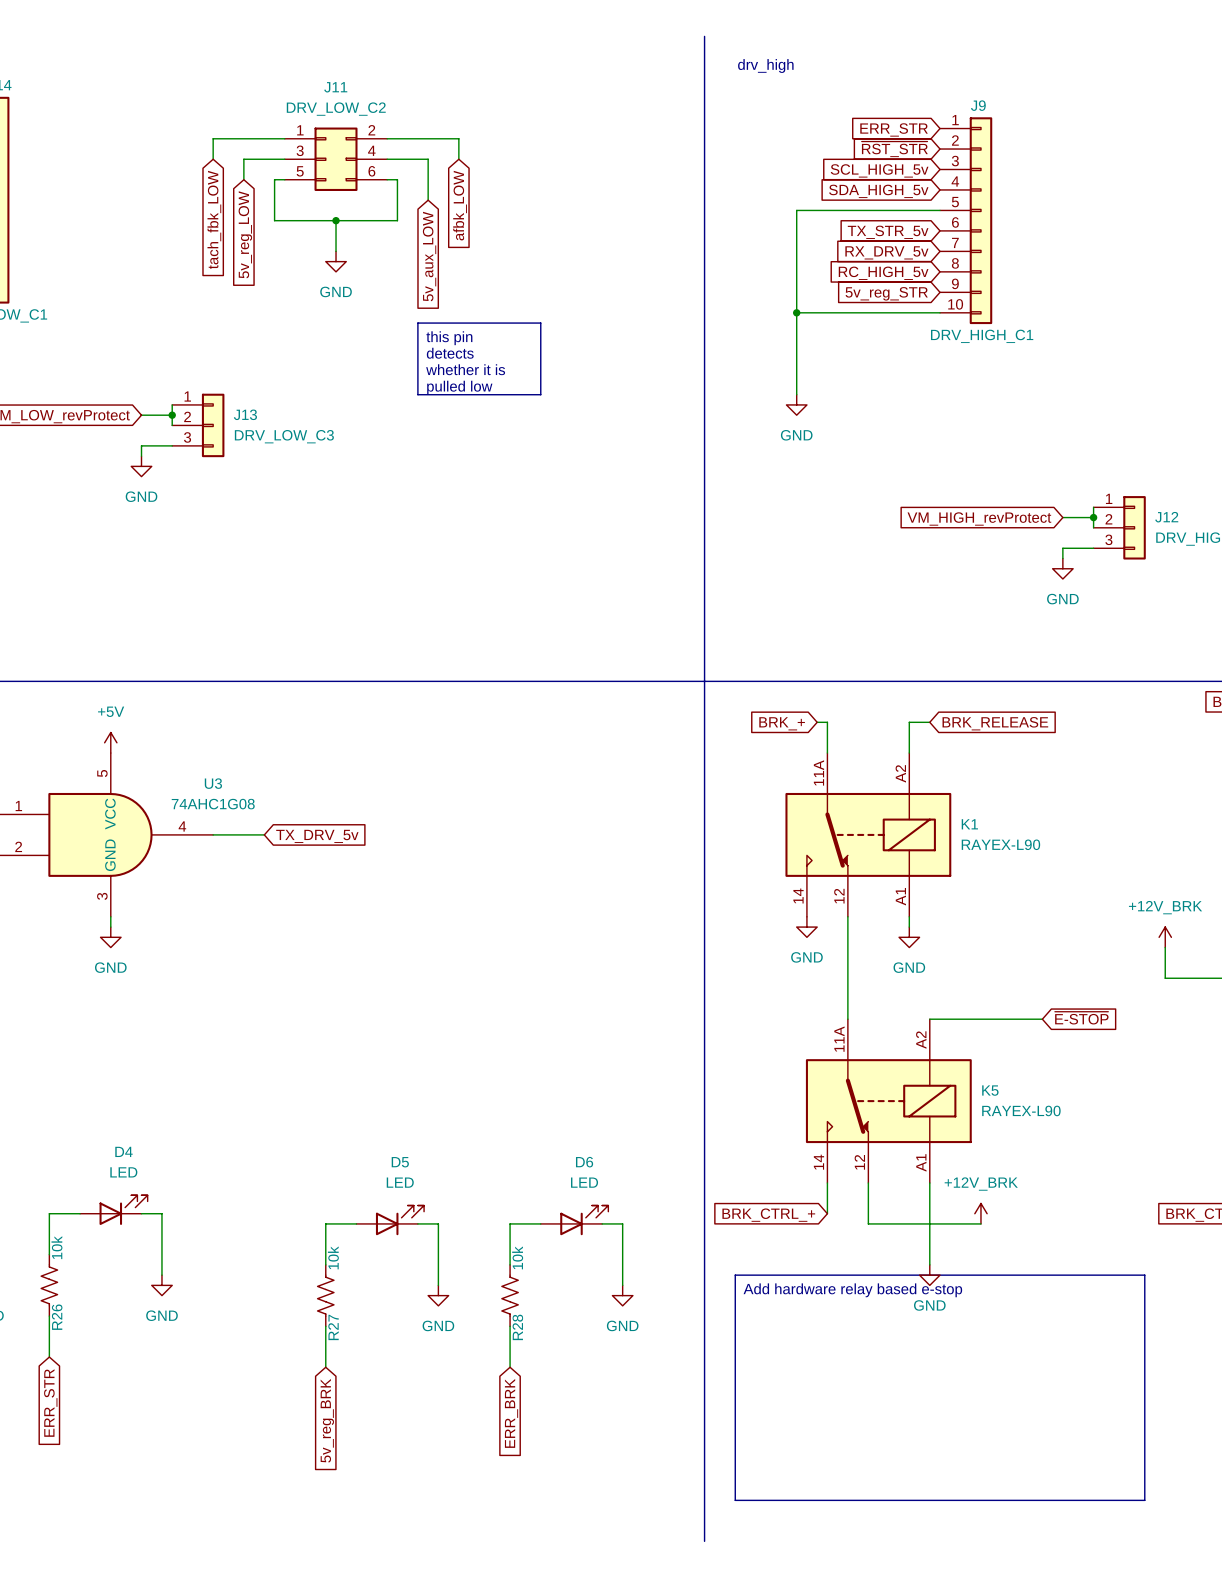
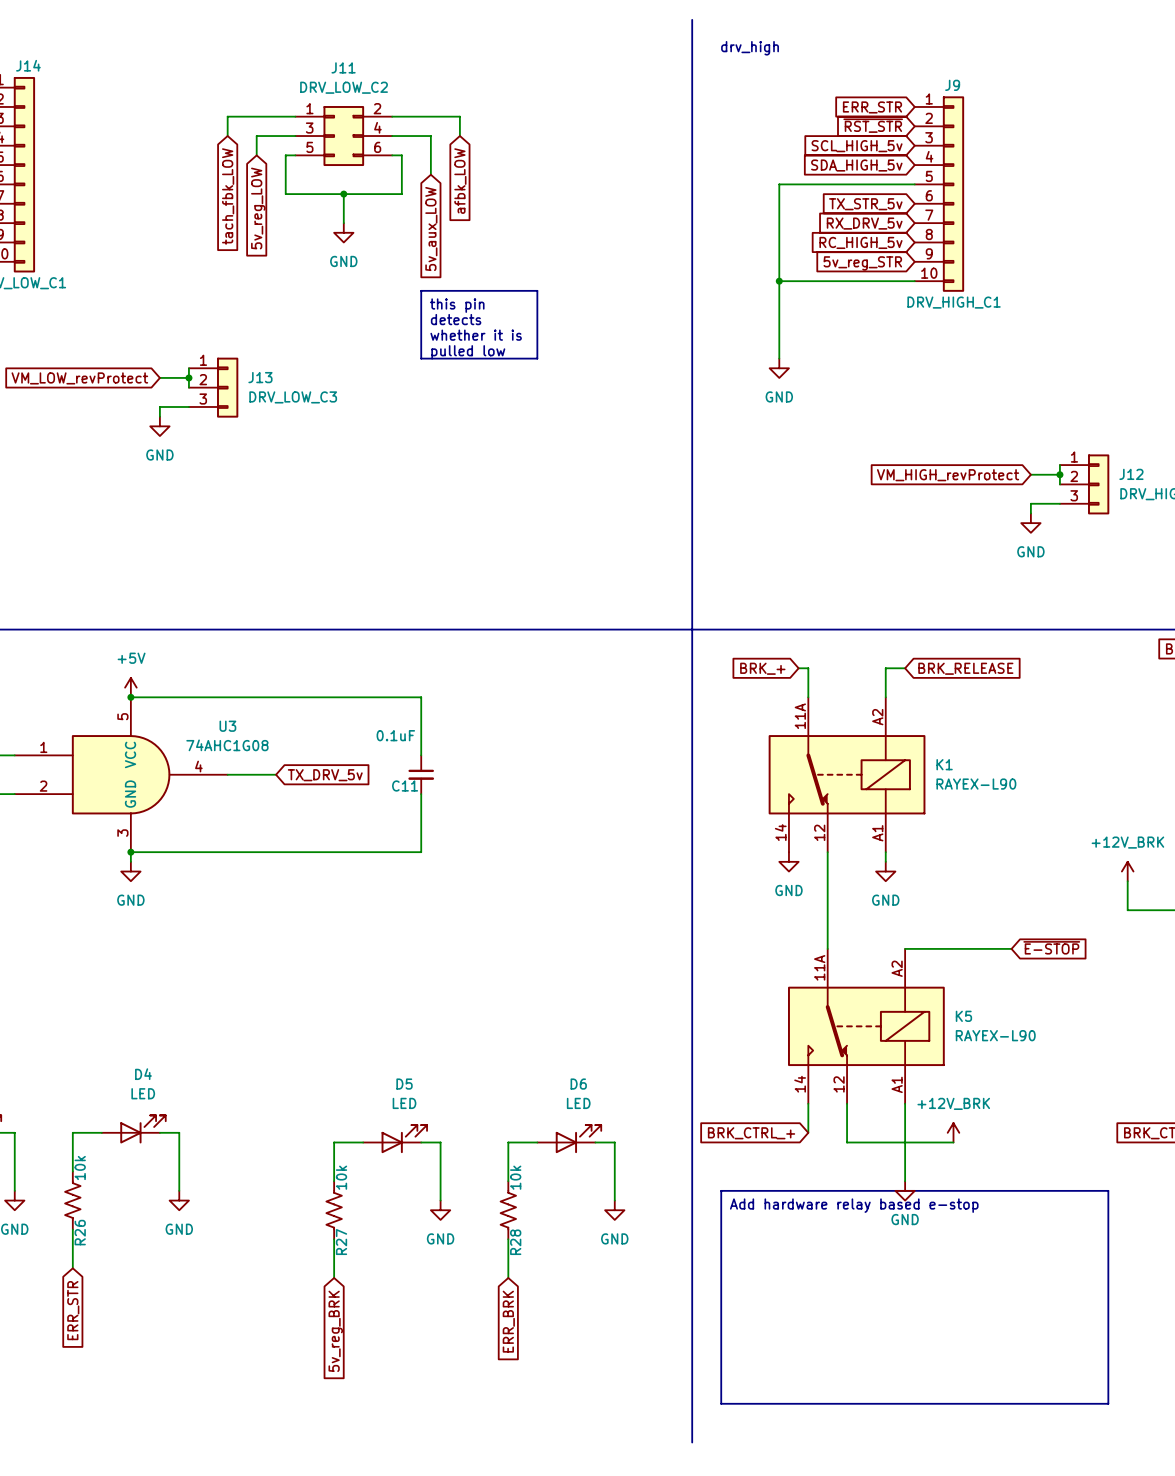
wire: none -> (130, 697) (421, 697) (421, 755)
junction: none -> (130, 697)
C11: none -> 0.1uF (421, 774)
wire: none -> (421, 794) (421, 852) (130, 852)
junction: none -> (130, 852)

